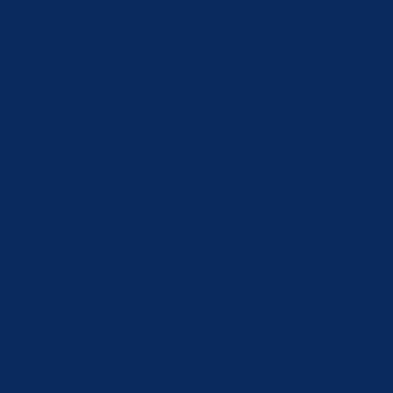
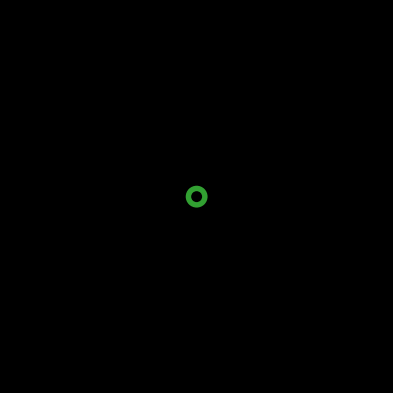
via: none -> (196, 196)

